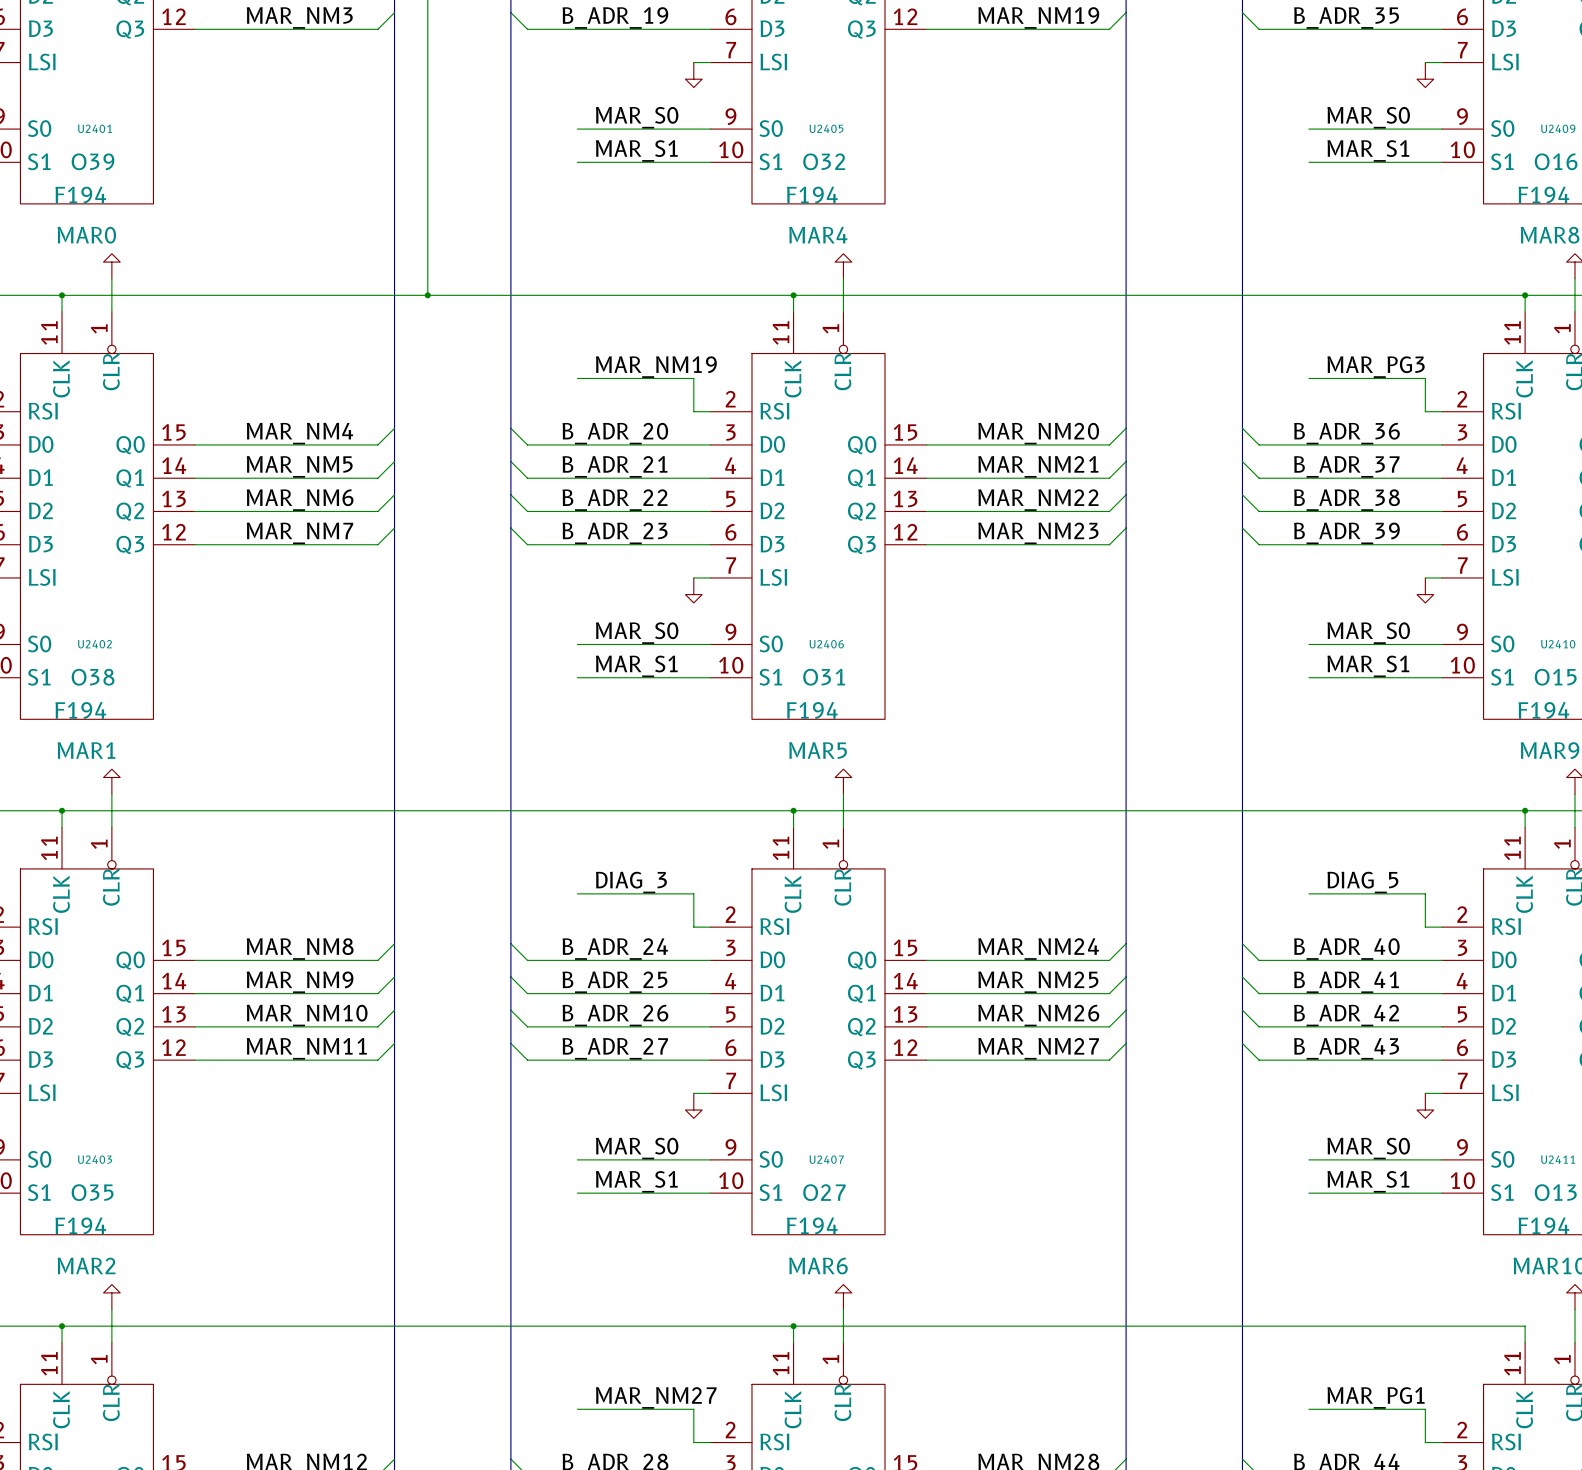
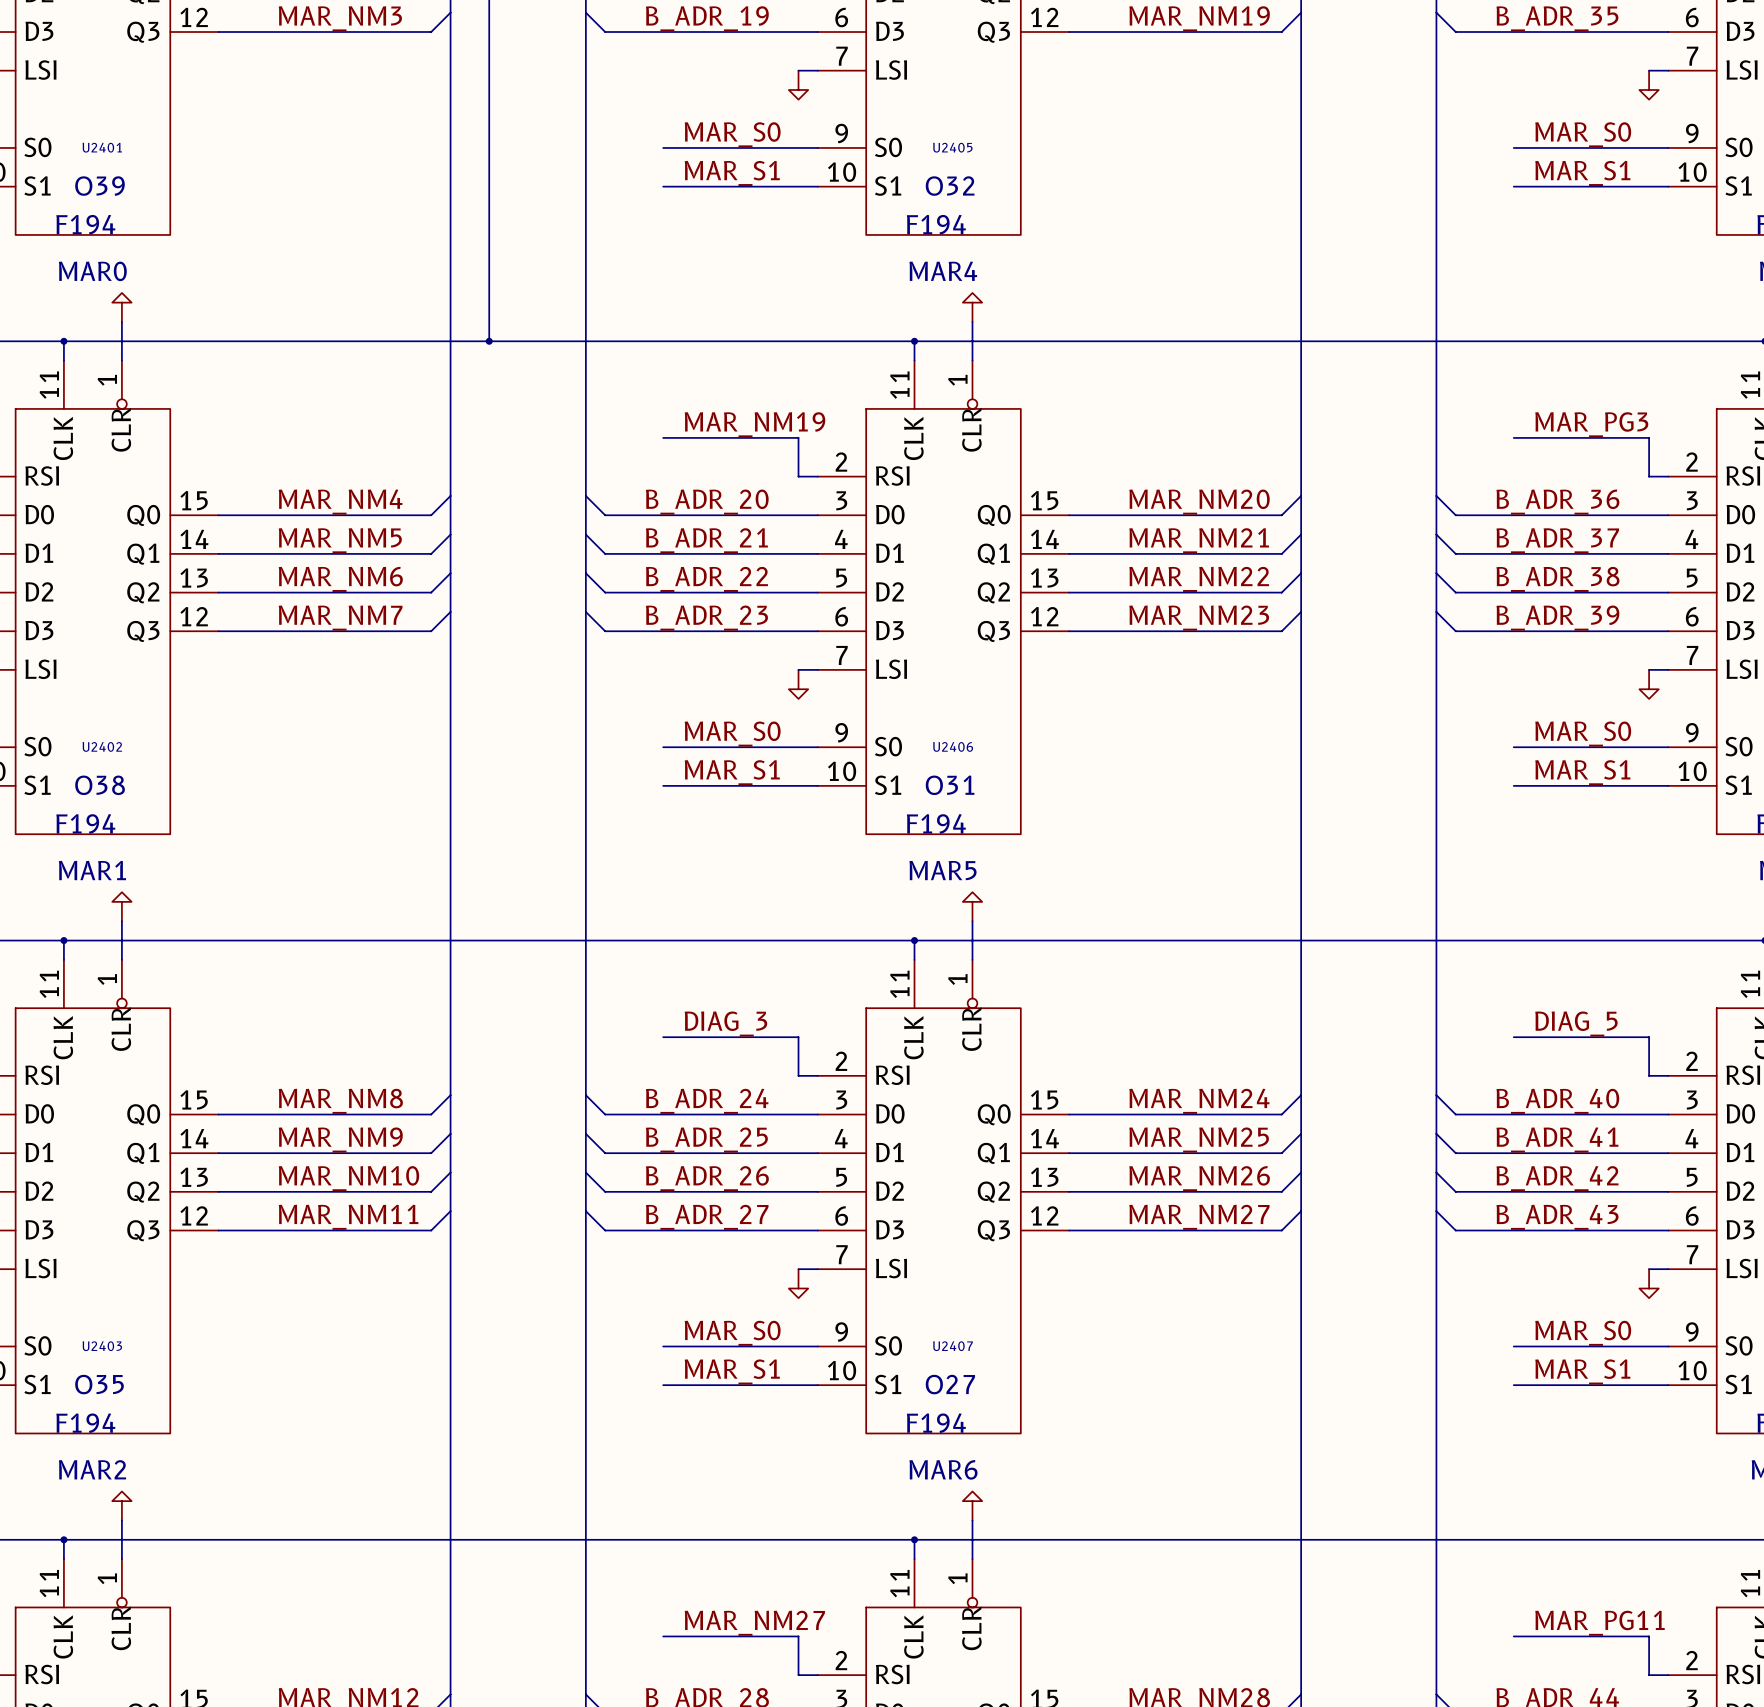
label: MAR_PG1 (1376, 1397) -> MAR_PG11 (1599, 1623)

